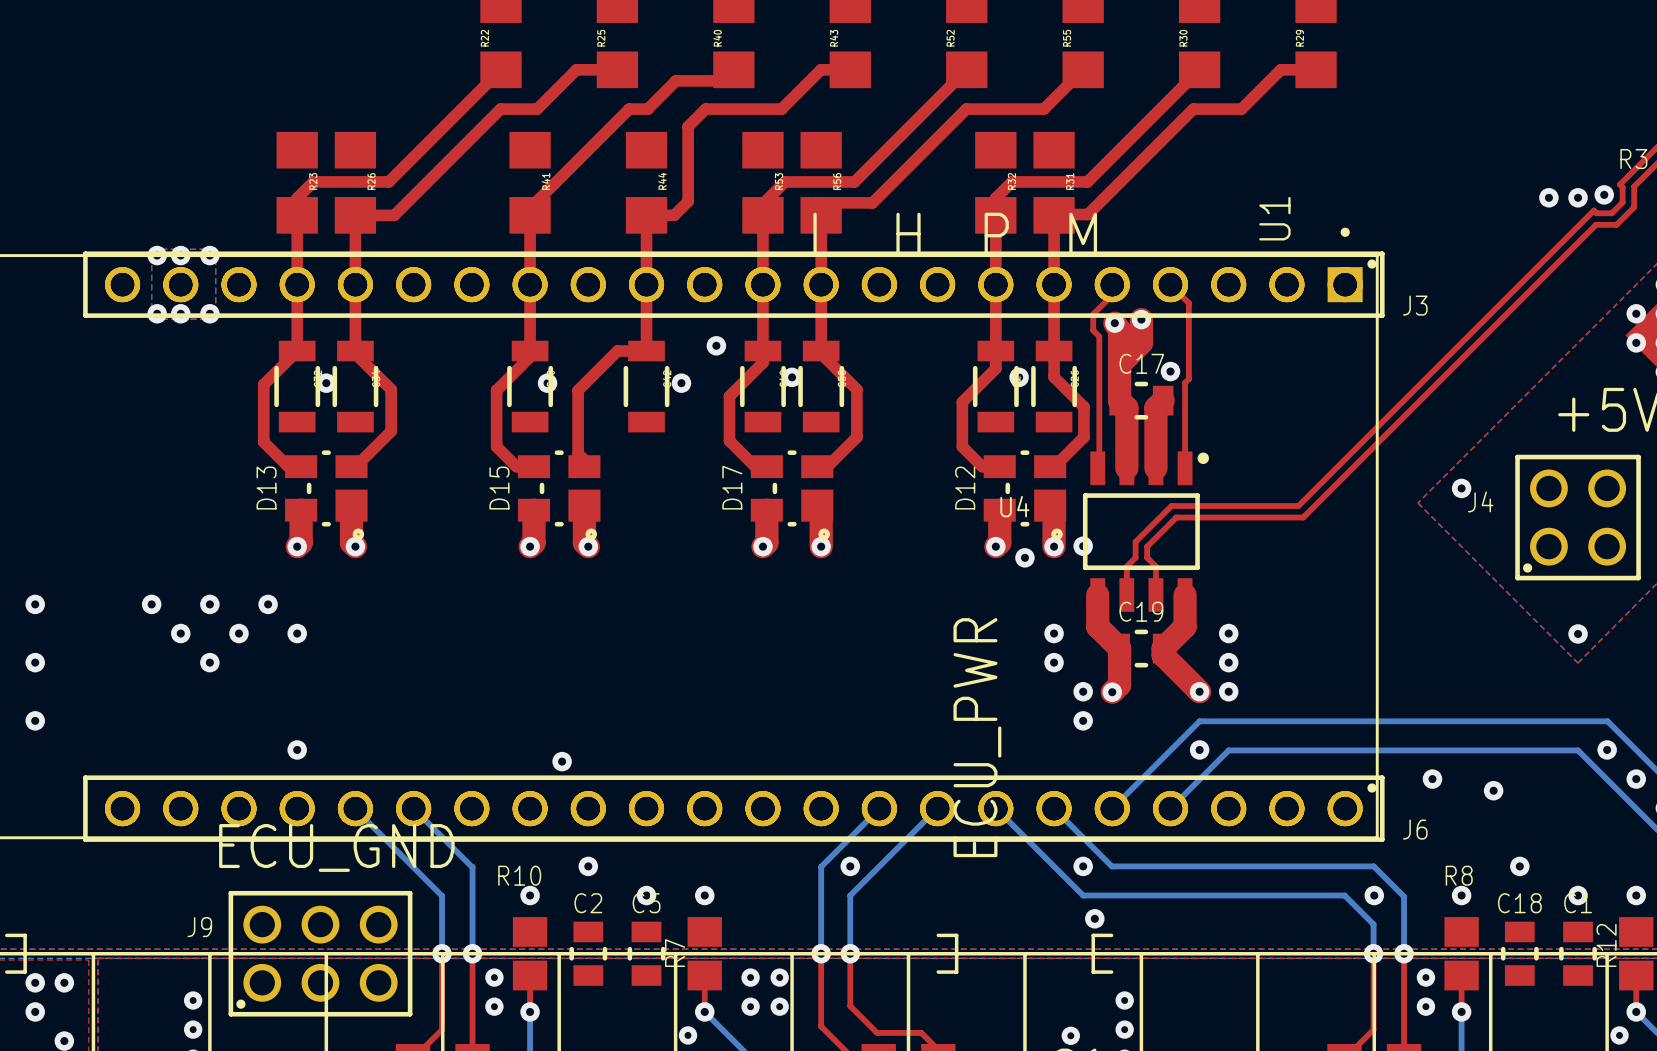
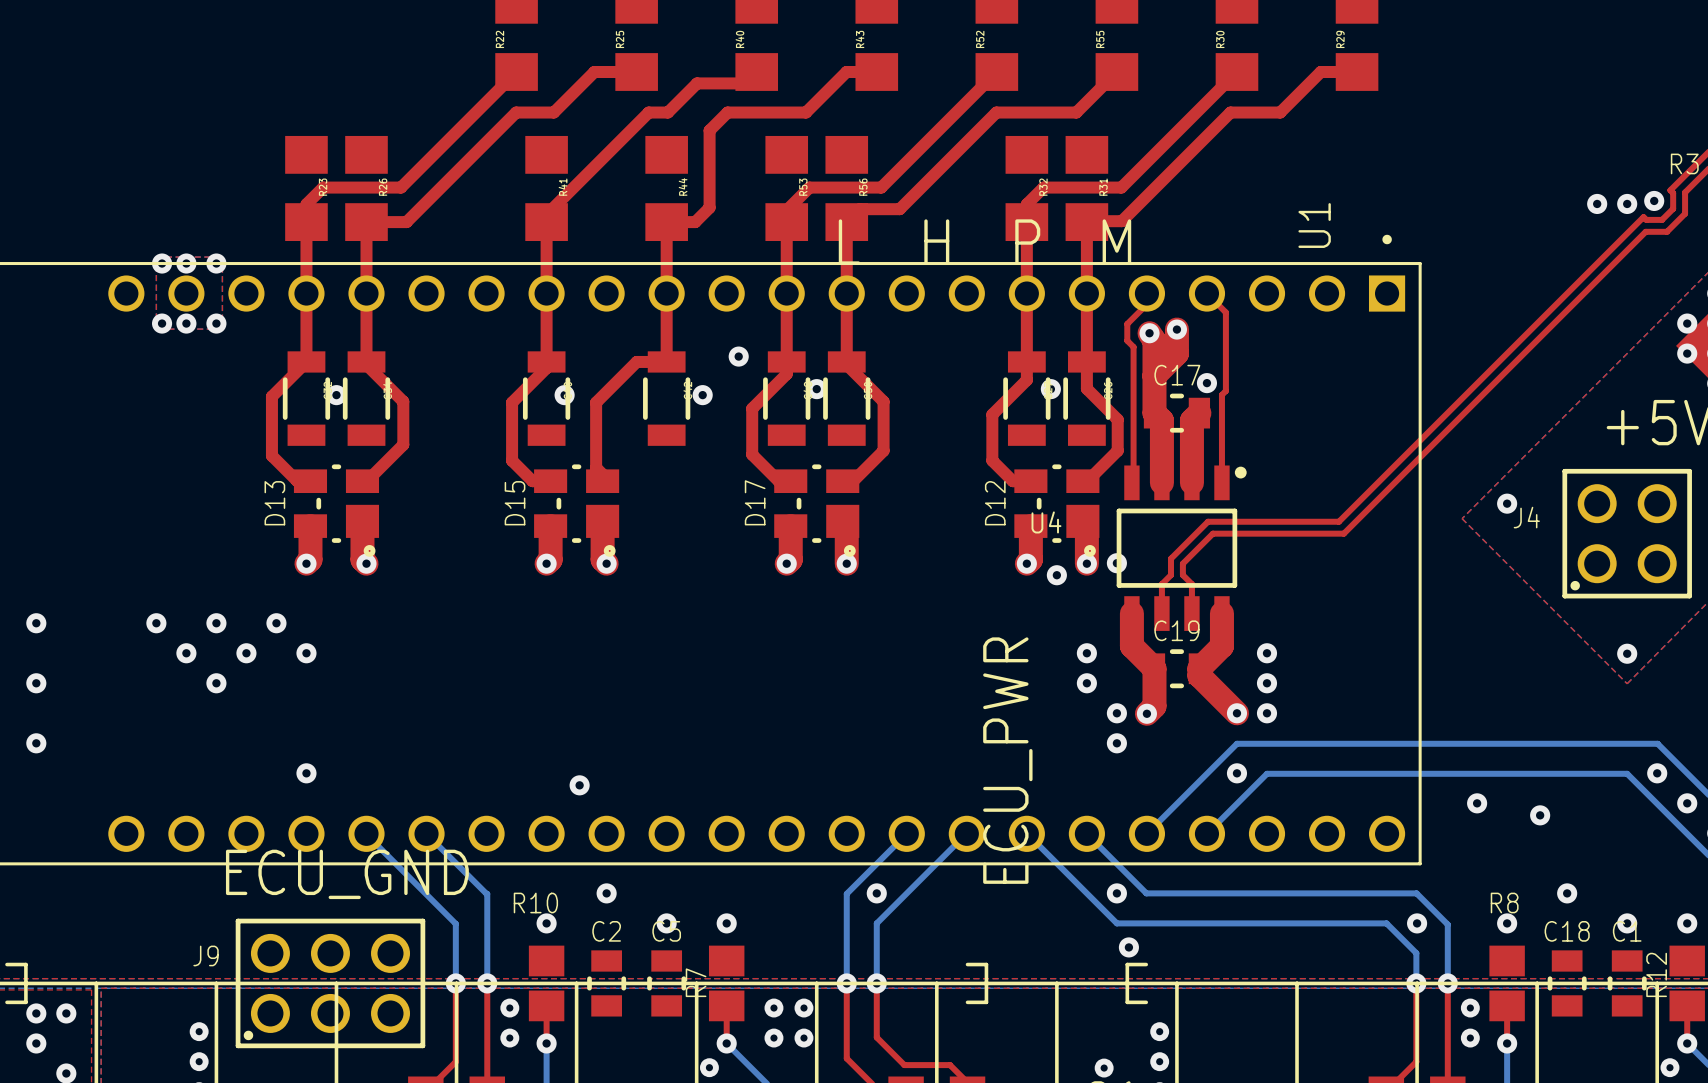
J3: (733, 284) -> none
J6: (733, 808) -> none

